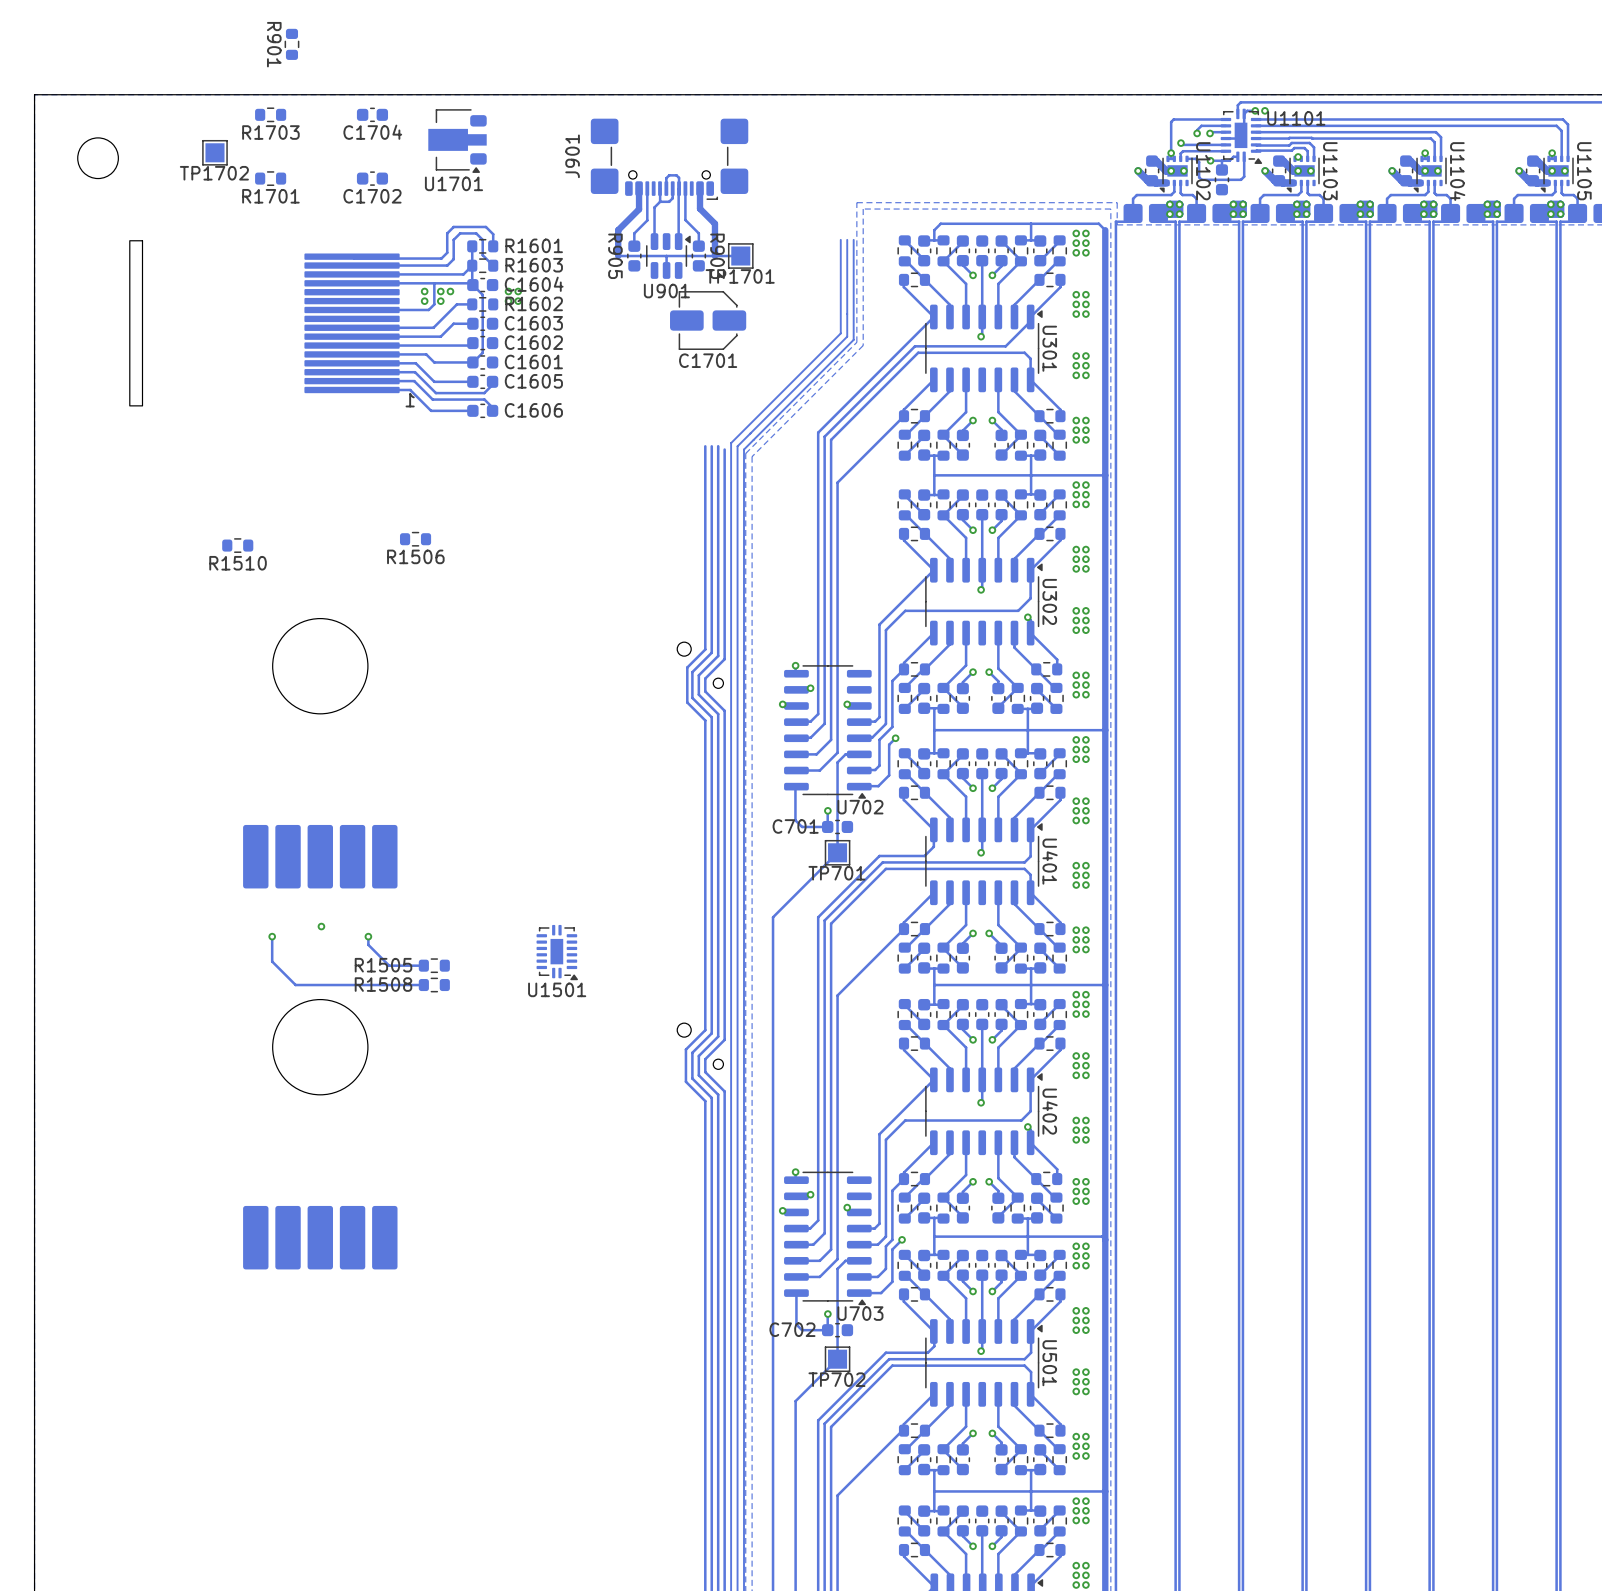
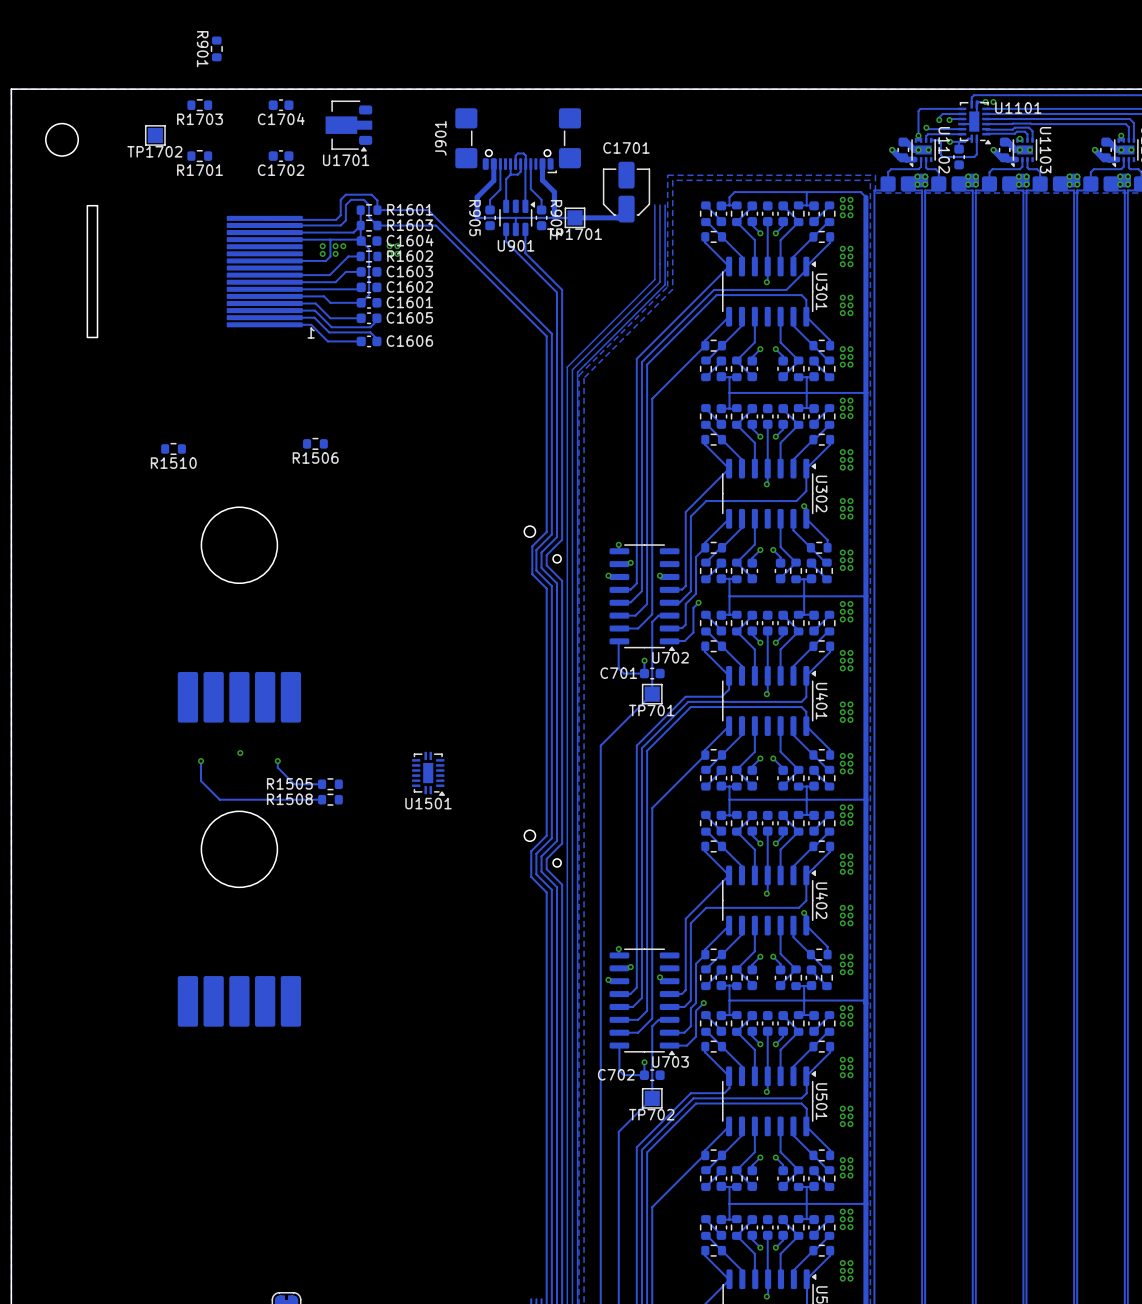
track: none -> (626, 209) (617, 217) (575, 217)
track: none -> (377, 210) (428, 210) (551, 333) (551, 369)
track: none -> (377, 225) (435, 225) (546, 336) (546, 369)
track: none -> (506, 229) (506, 241) (556, 292) (556, 369)
track: none -> (525, 229) (525, 253) (562, 289) (562, 372)
C1701 rotation: 0° (708, 320) -> 90° clockwise (626, 192)
C1701 position: (708, 320) -> (626, 192)
C1701 name position: C1701 (708, 360) -> C1701 (626, 147)

